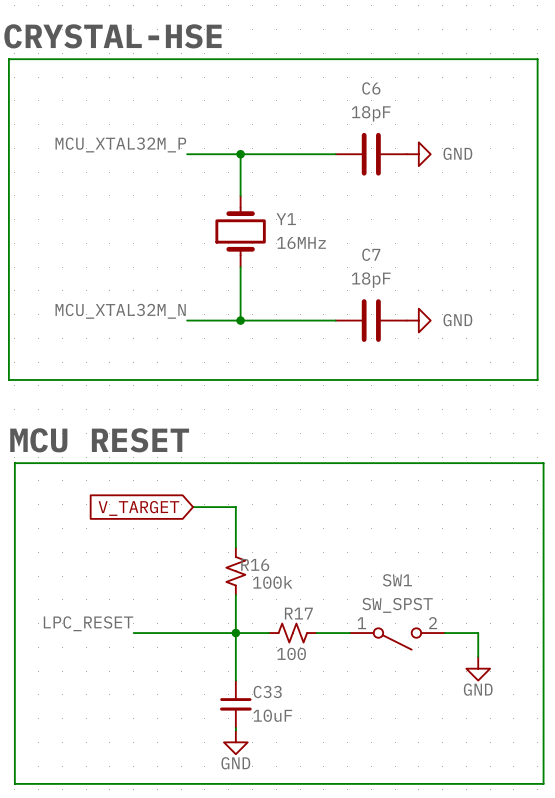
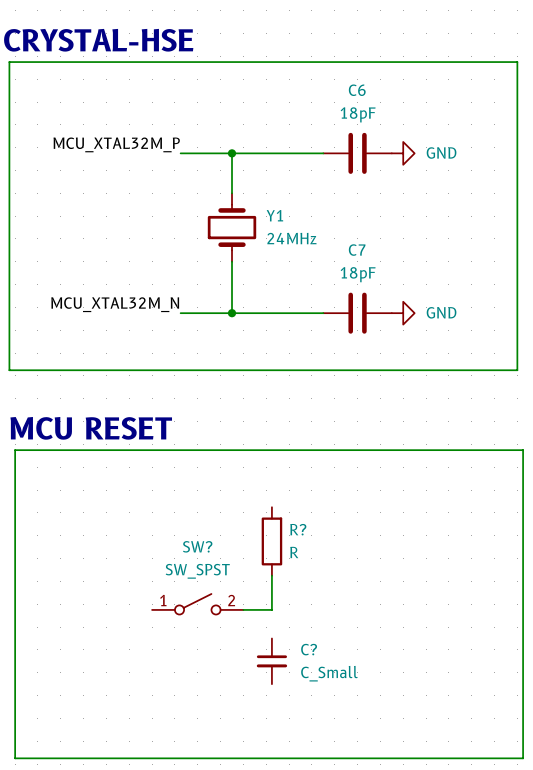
Y1 value: 16MHz (301, 243) -> 24MHz (291, 238)
wire: (193, 507) (235, 507) (235, 547) -> none
global label: V_TARGET (138, 508) -> none
R?: none -> R (271, 541)
R16: 100k (235, 571) -> none
wire: none -> (271, 575) (271, 609) (243, 609)
wire: (235, 595) (235, 680) -> none
label: LPC_RESET (88, 623) -> none
SW?: none -> SW_SPST (197, 604)
wire: (133, 633) (269, 633) -> none
junction: (235, 633) -> none
R17: 100 (292, 633) -> none
wire: (316, 633) (349, 633) -> none
wire: (444, 633) (478, 633) (478, 656) -> none
SW1: SW_SPST (397, 638) -> none
power symbol: GND (478, 668) -> none
C?: none -> C_Small (271, 661)
C33: 10uF (235, 704) -> none
wire: (235, 728) (235, 730) -> none
power symbol: GND (235, 742) -> none

